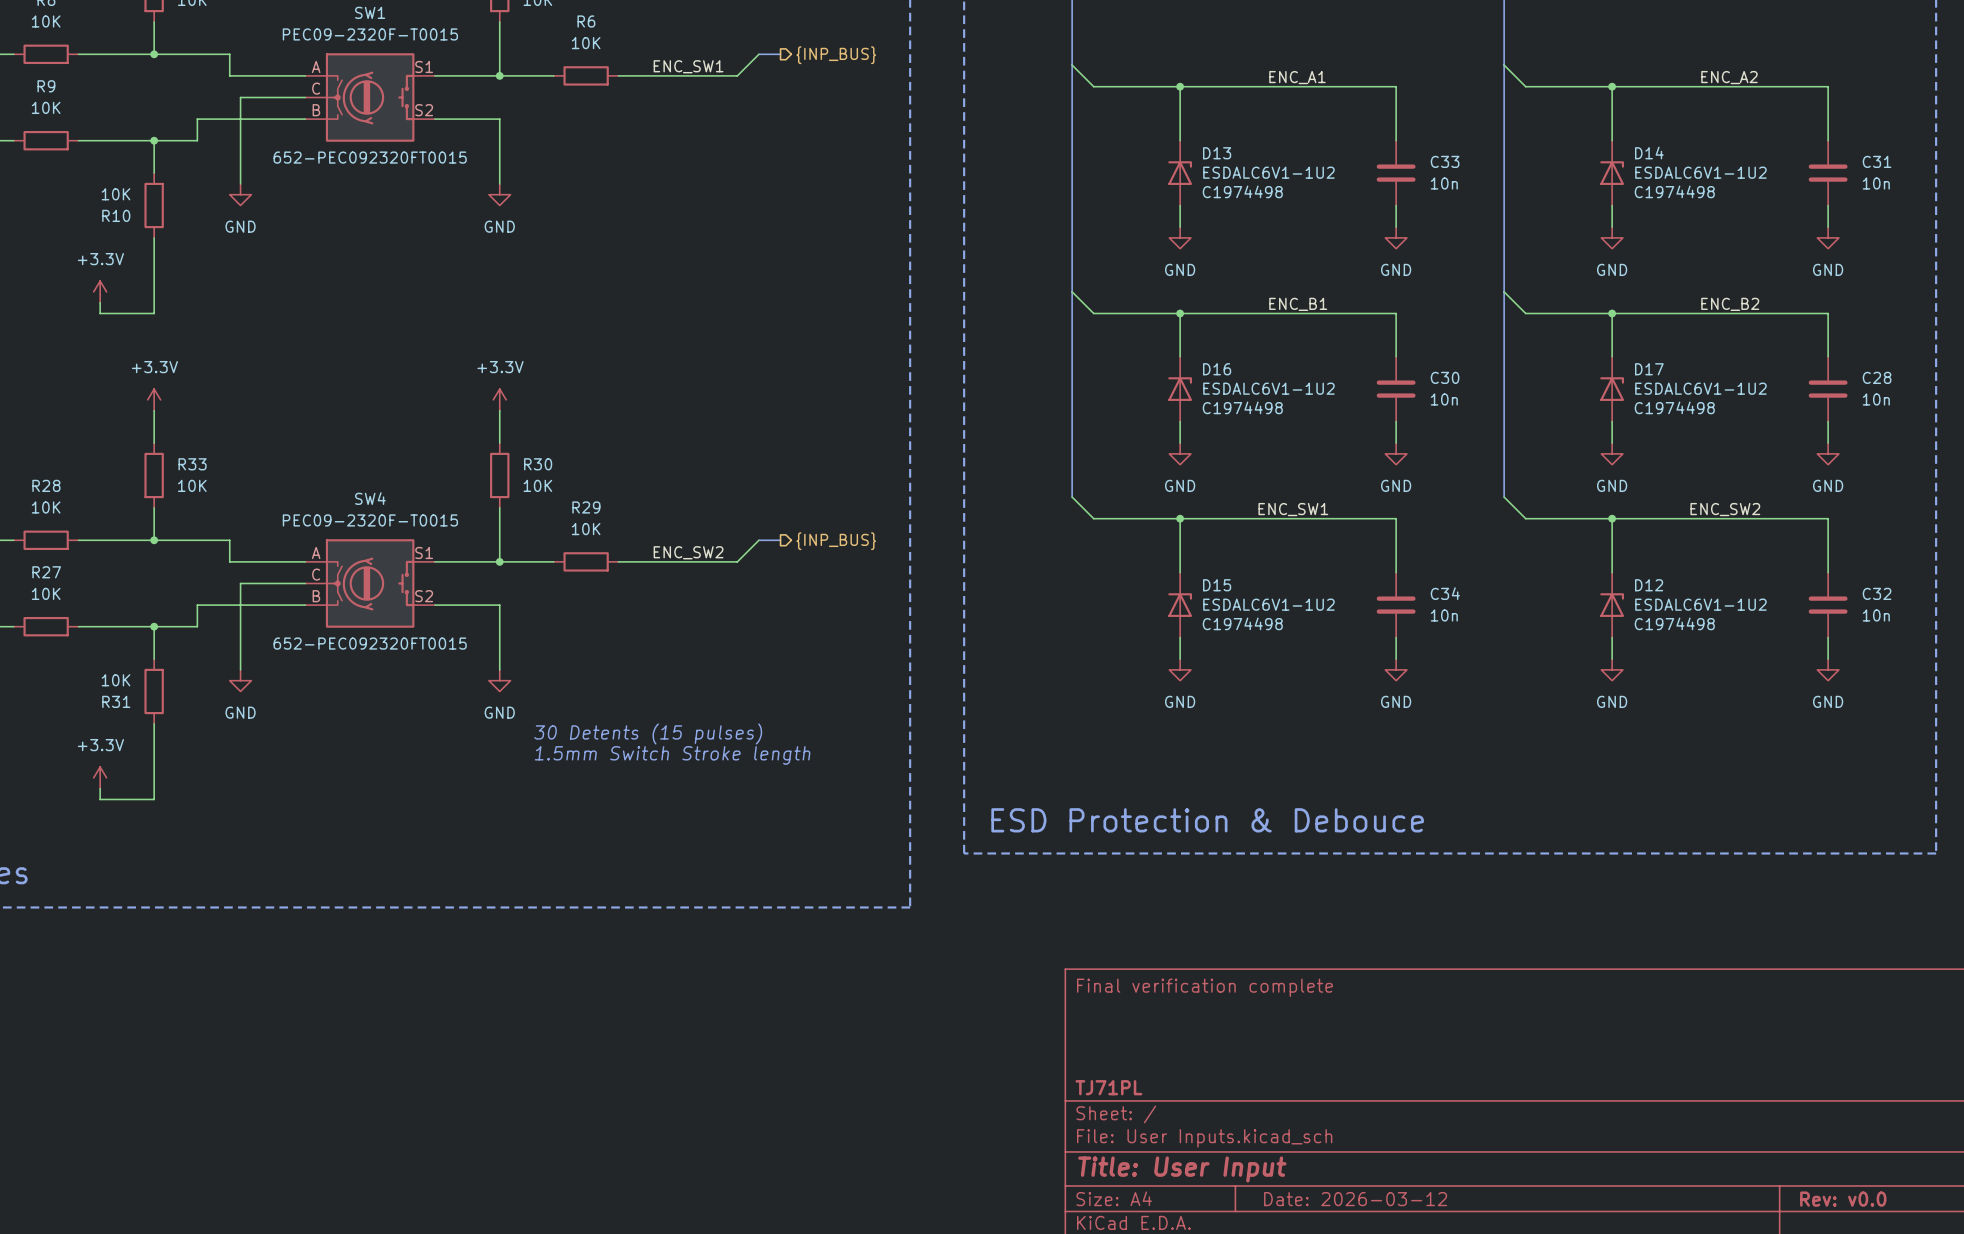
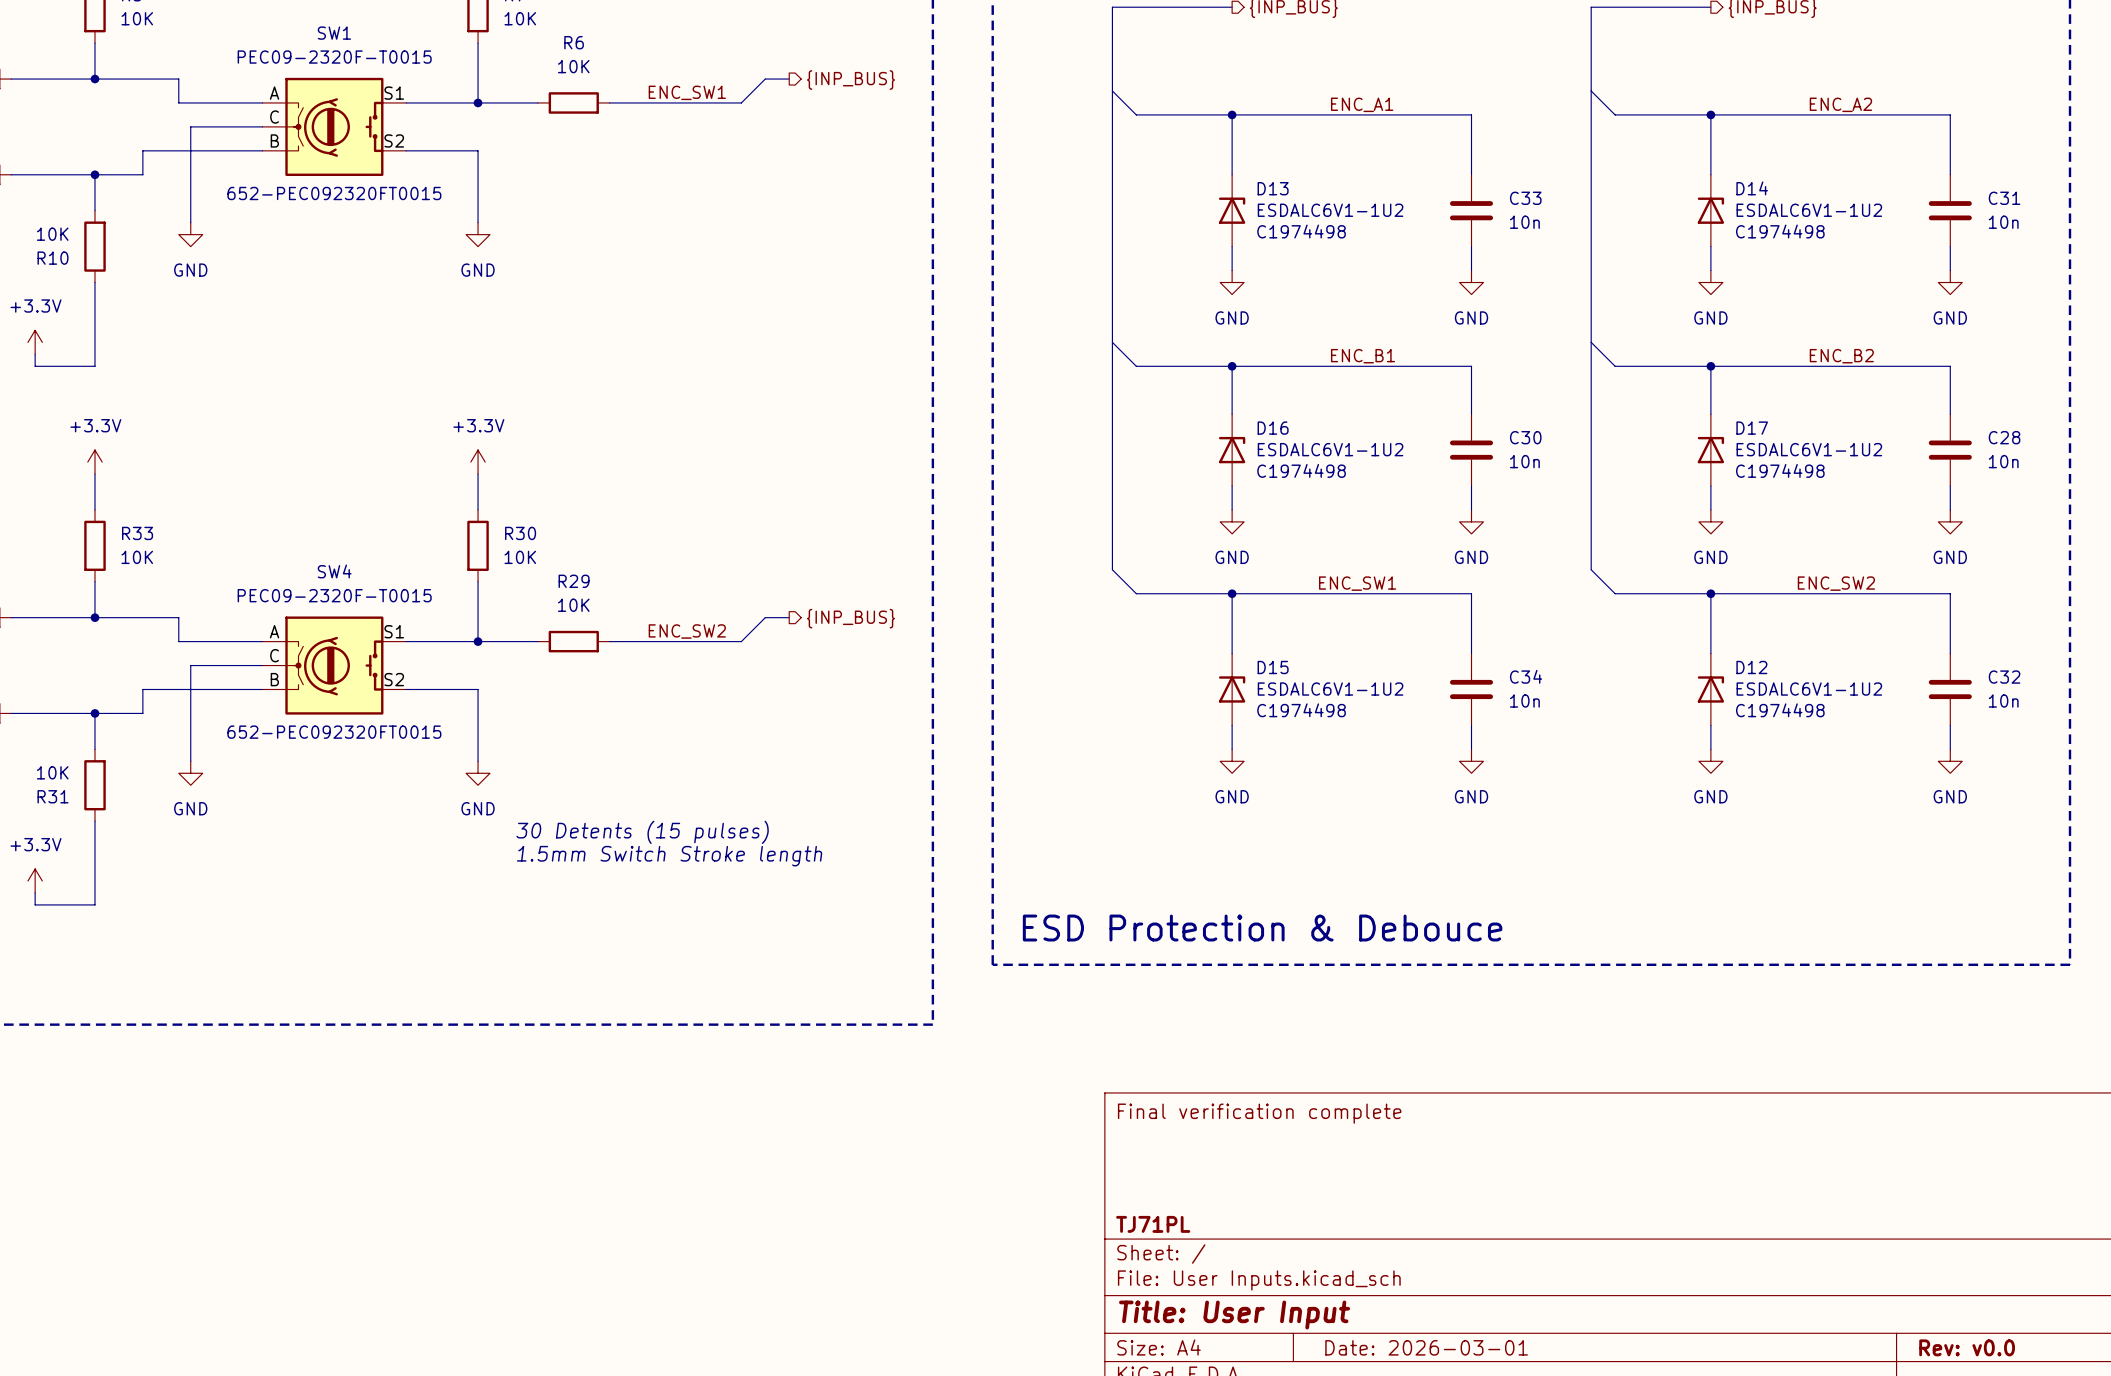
title block: Date: 2026-03-12 (1355, 1199) -> Date: 2026-03-01 (1426, 1347)

